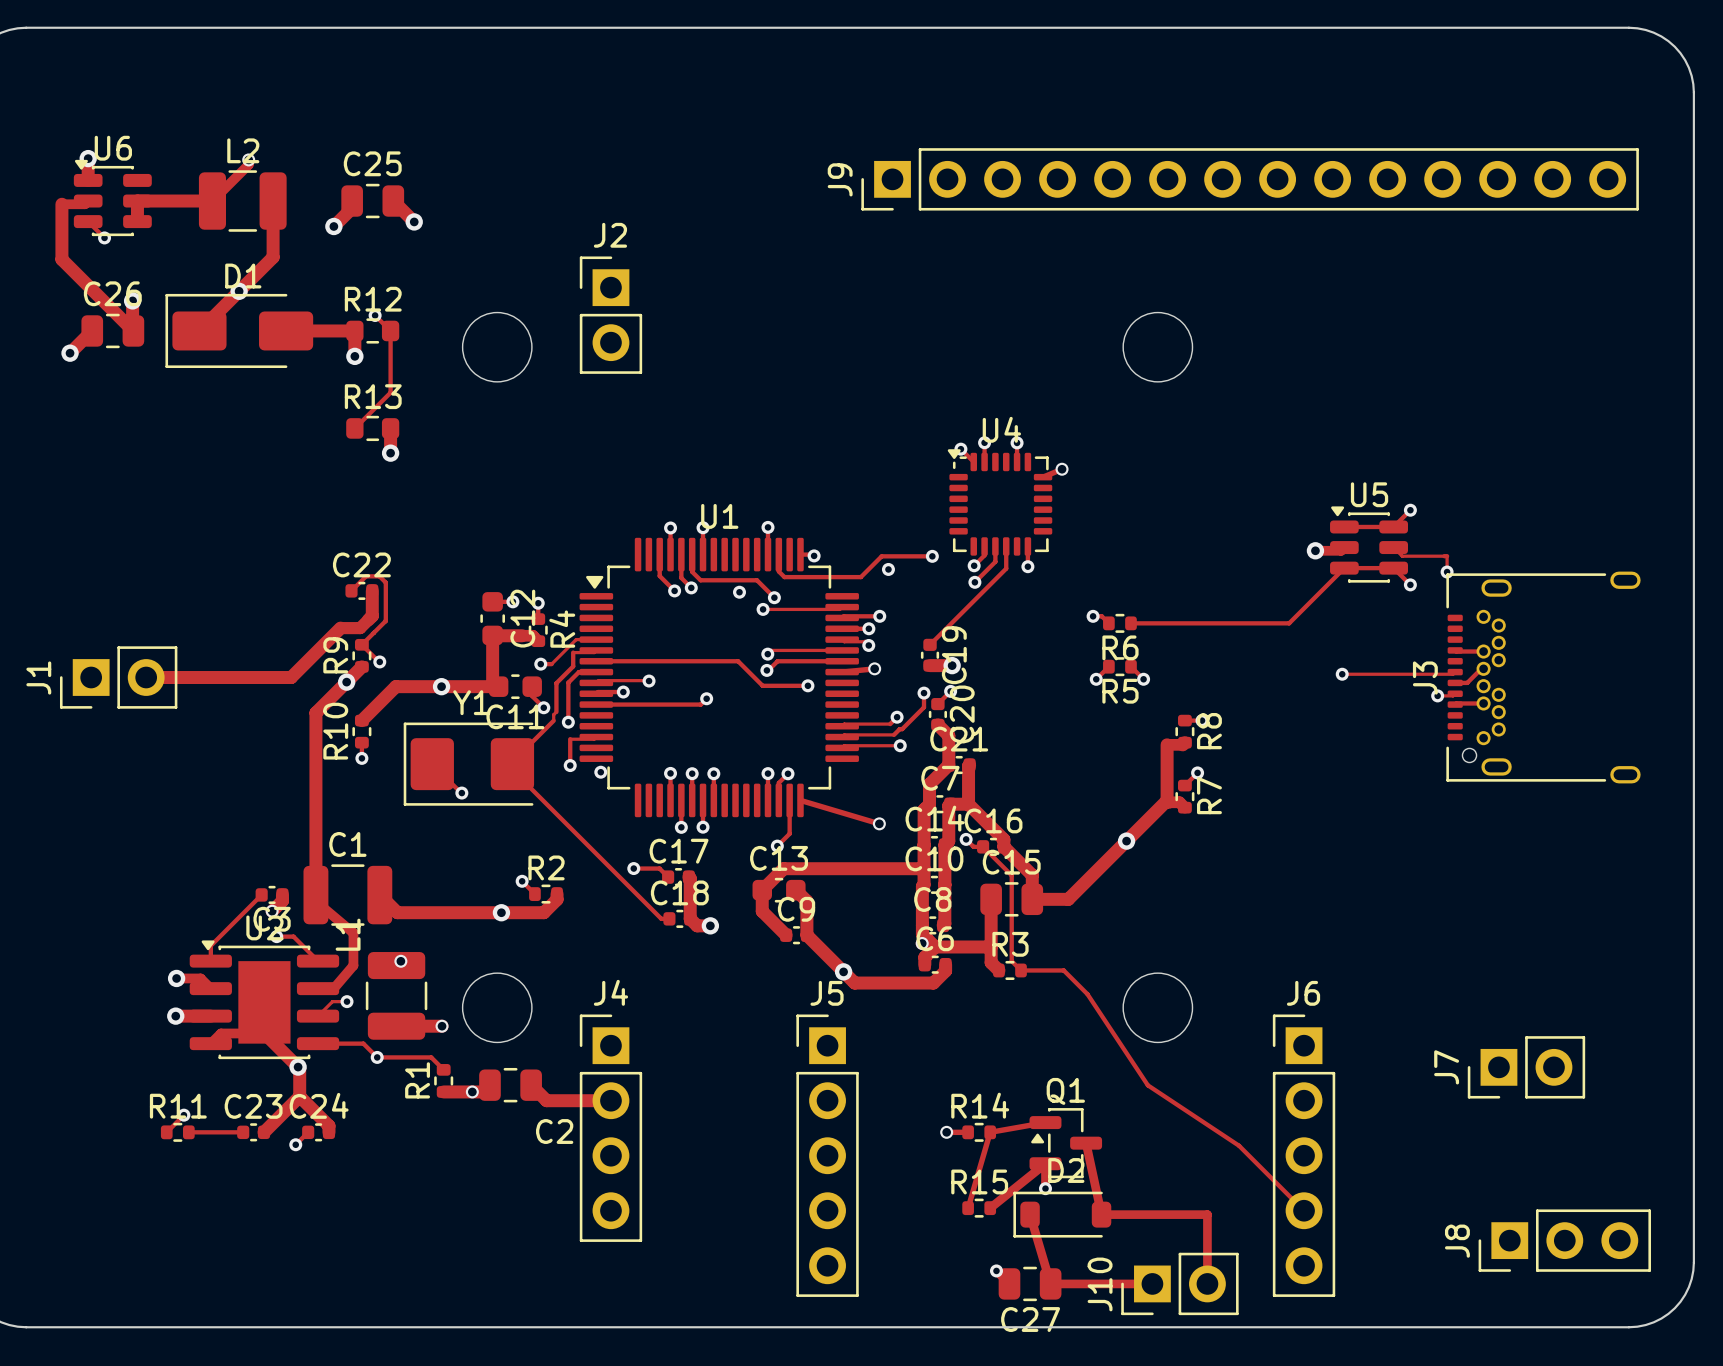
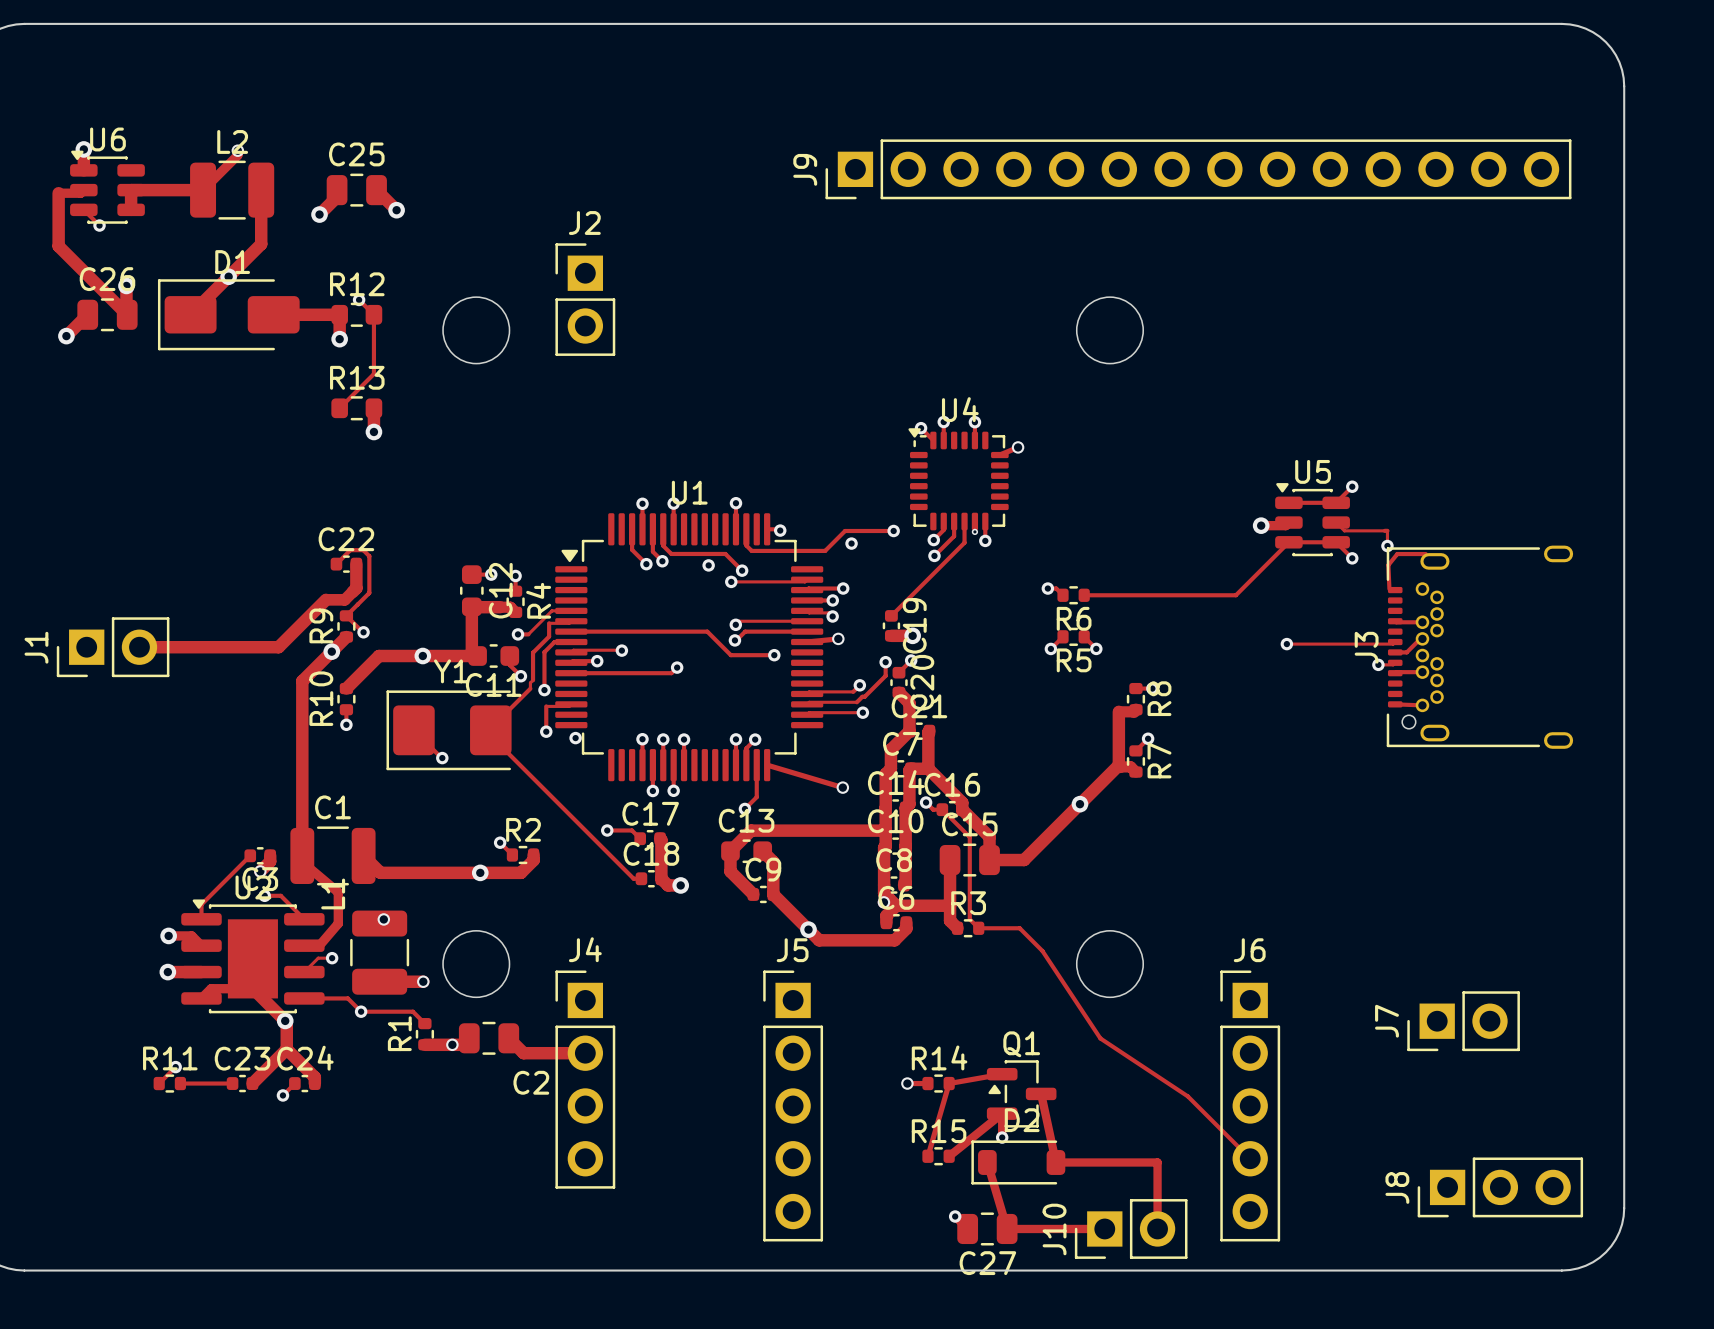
via: none -> (974, 531)
track: none -> (1425, 554) (1397, 554) (1388, 565) (1389, 589)
track: none -> (1395, 704) (1422, 705)

